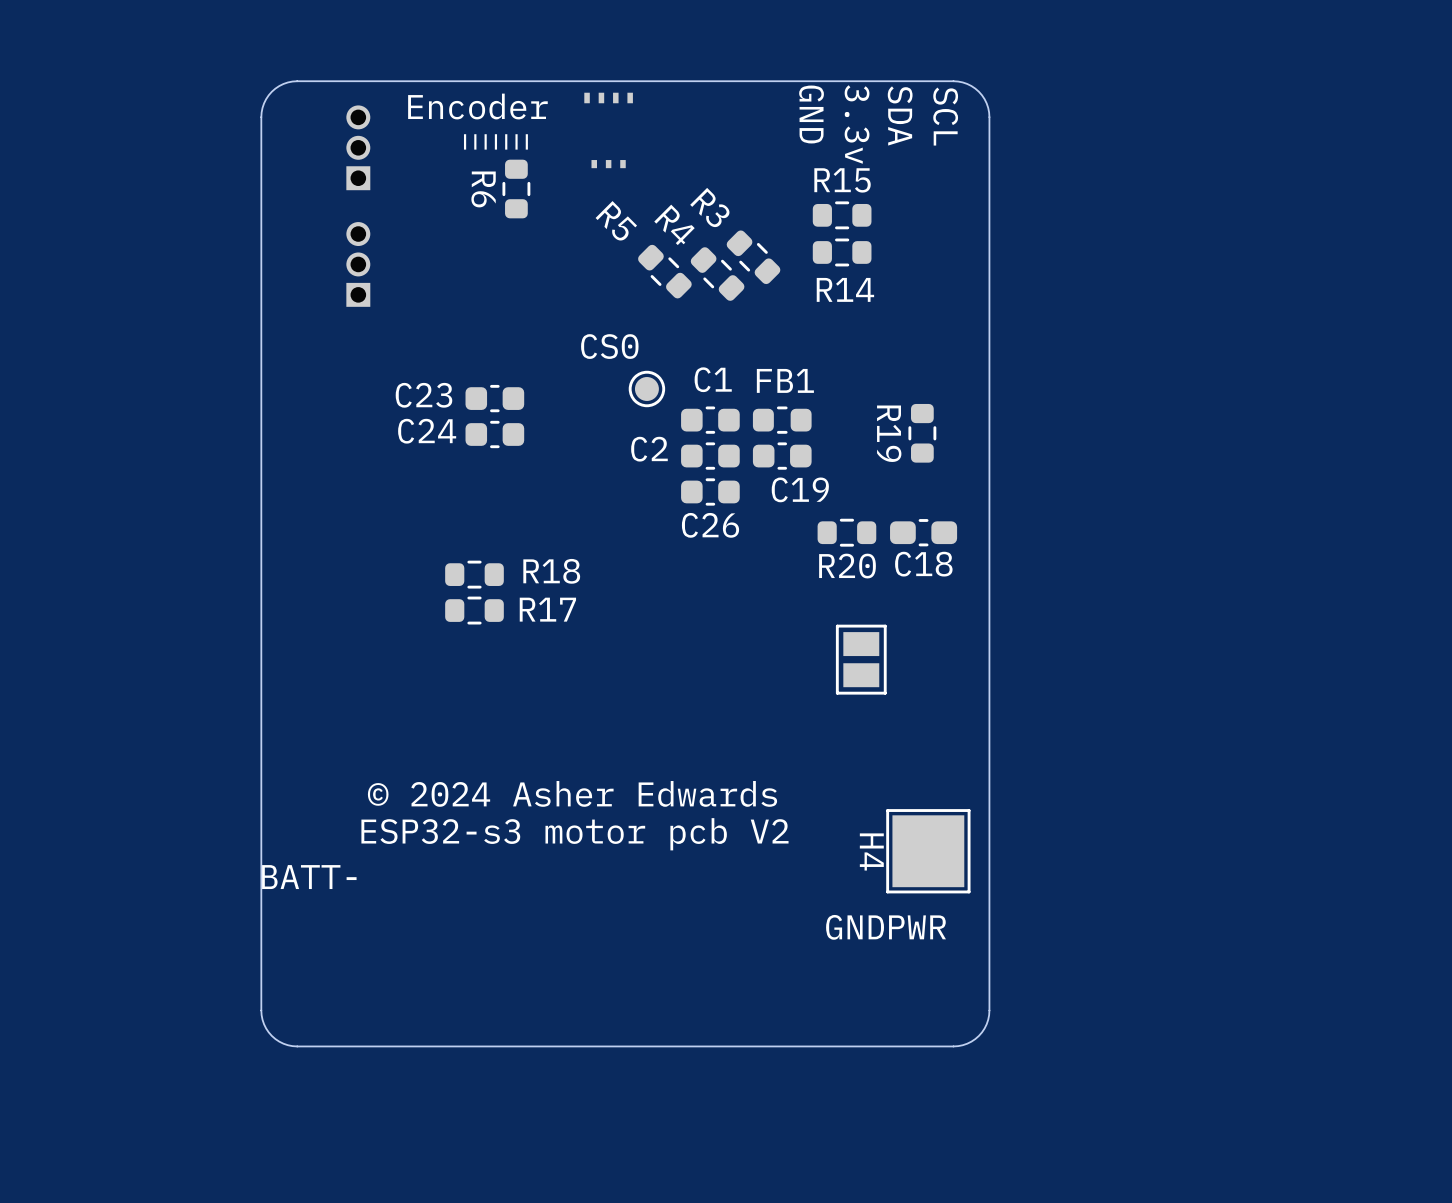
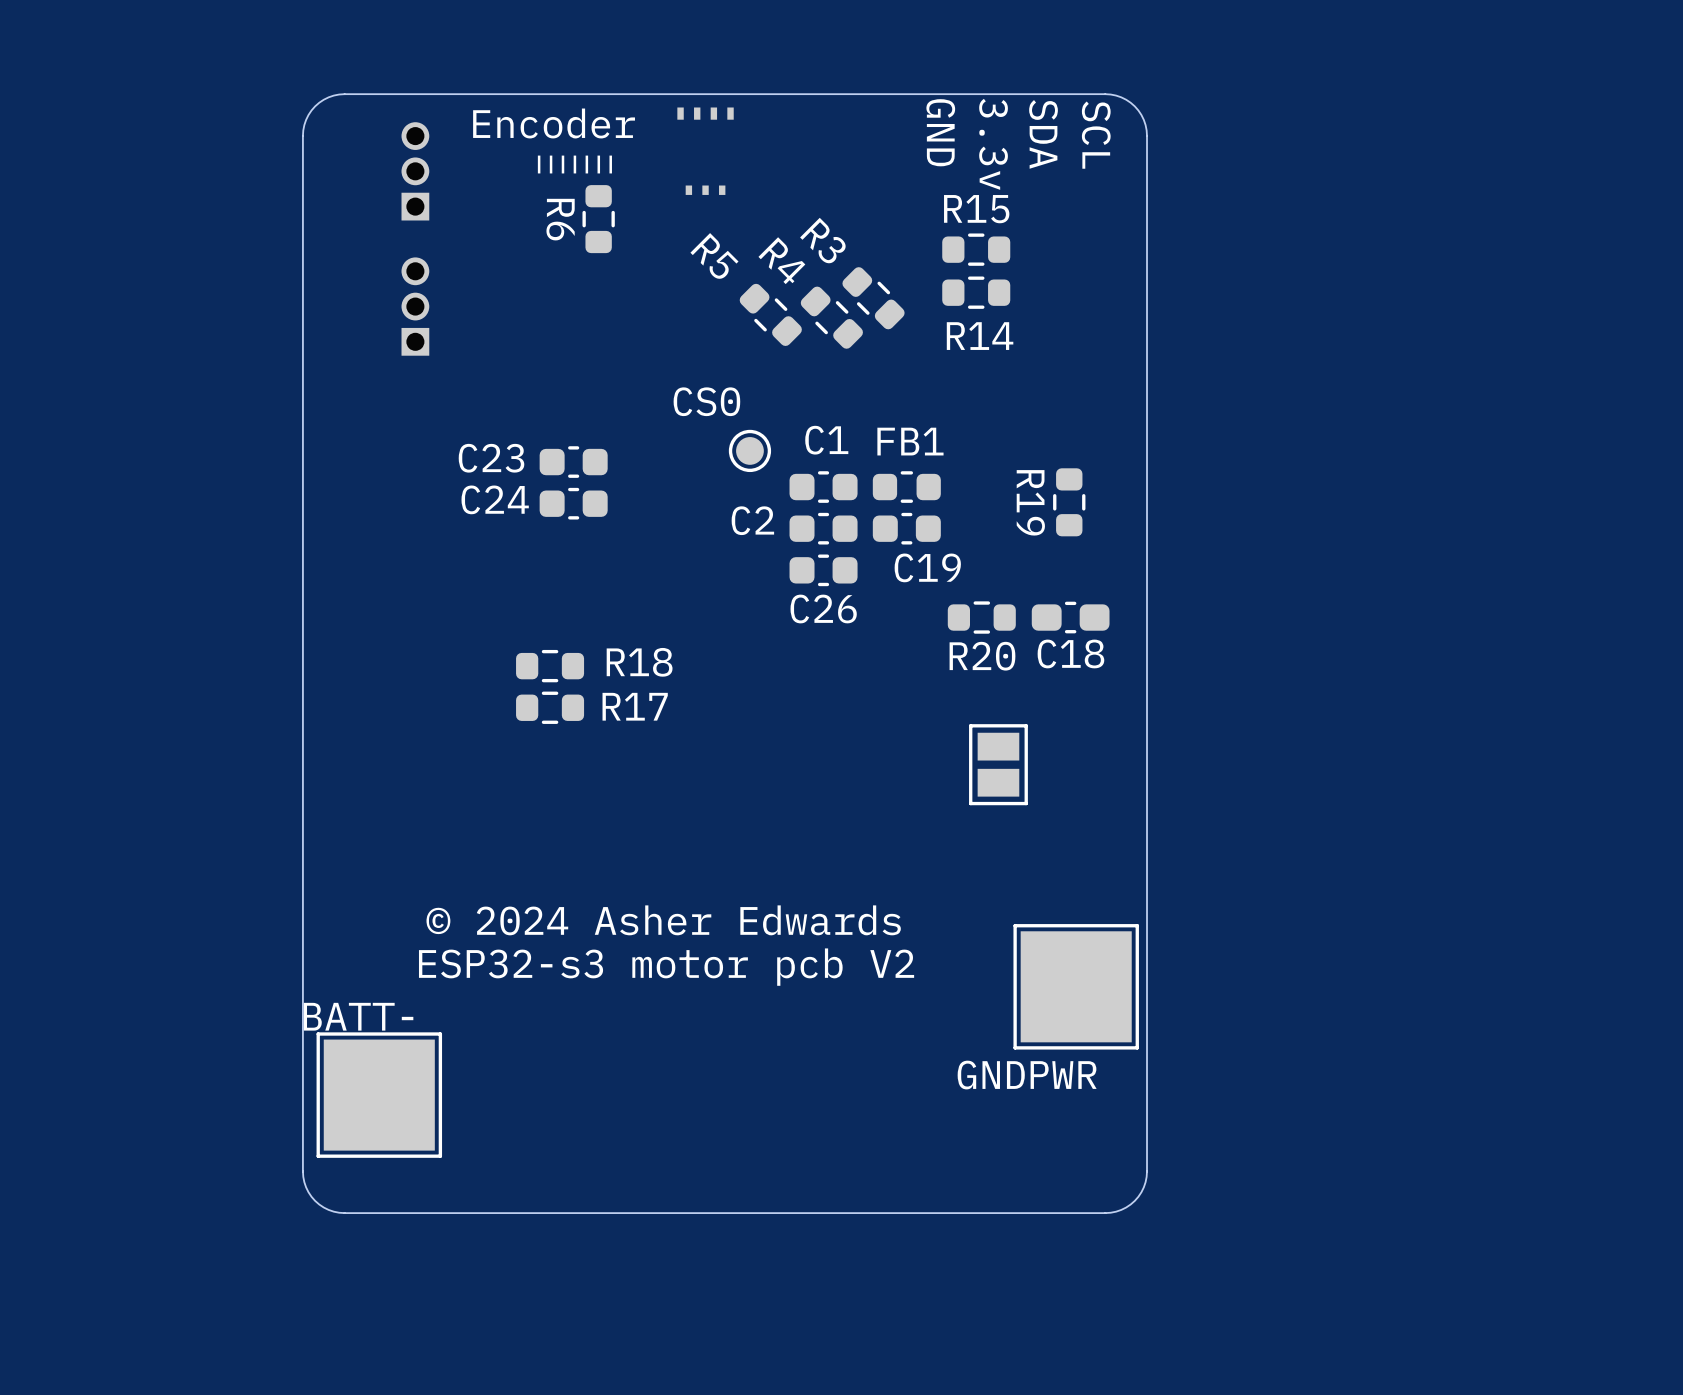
H4: (928, 851) -> none
part: none -> (1076, 986)
part: none -> (379, 1095)

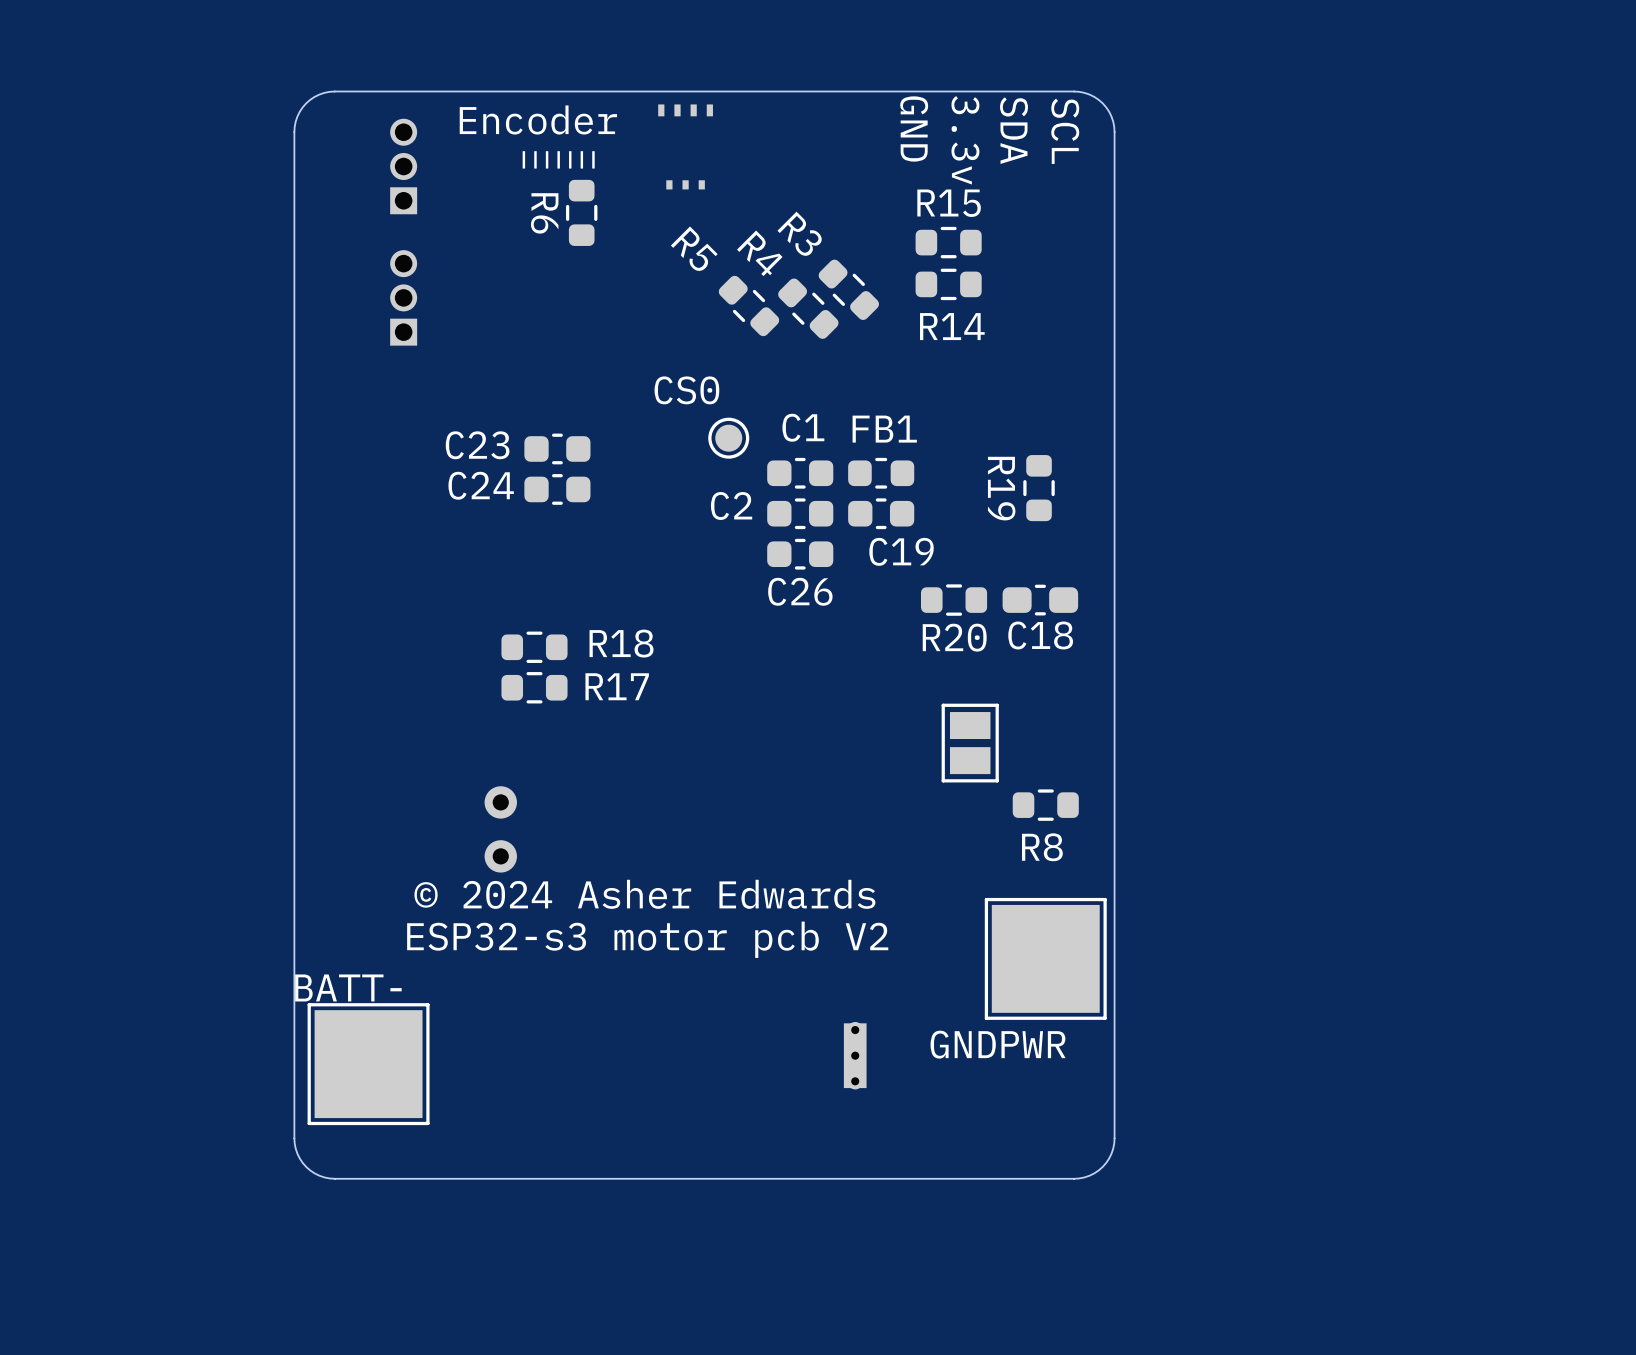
R8: none -> (1045, 805)
part: none -> (500, 829)
part: none -> (855, 1055)

